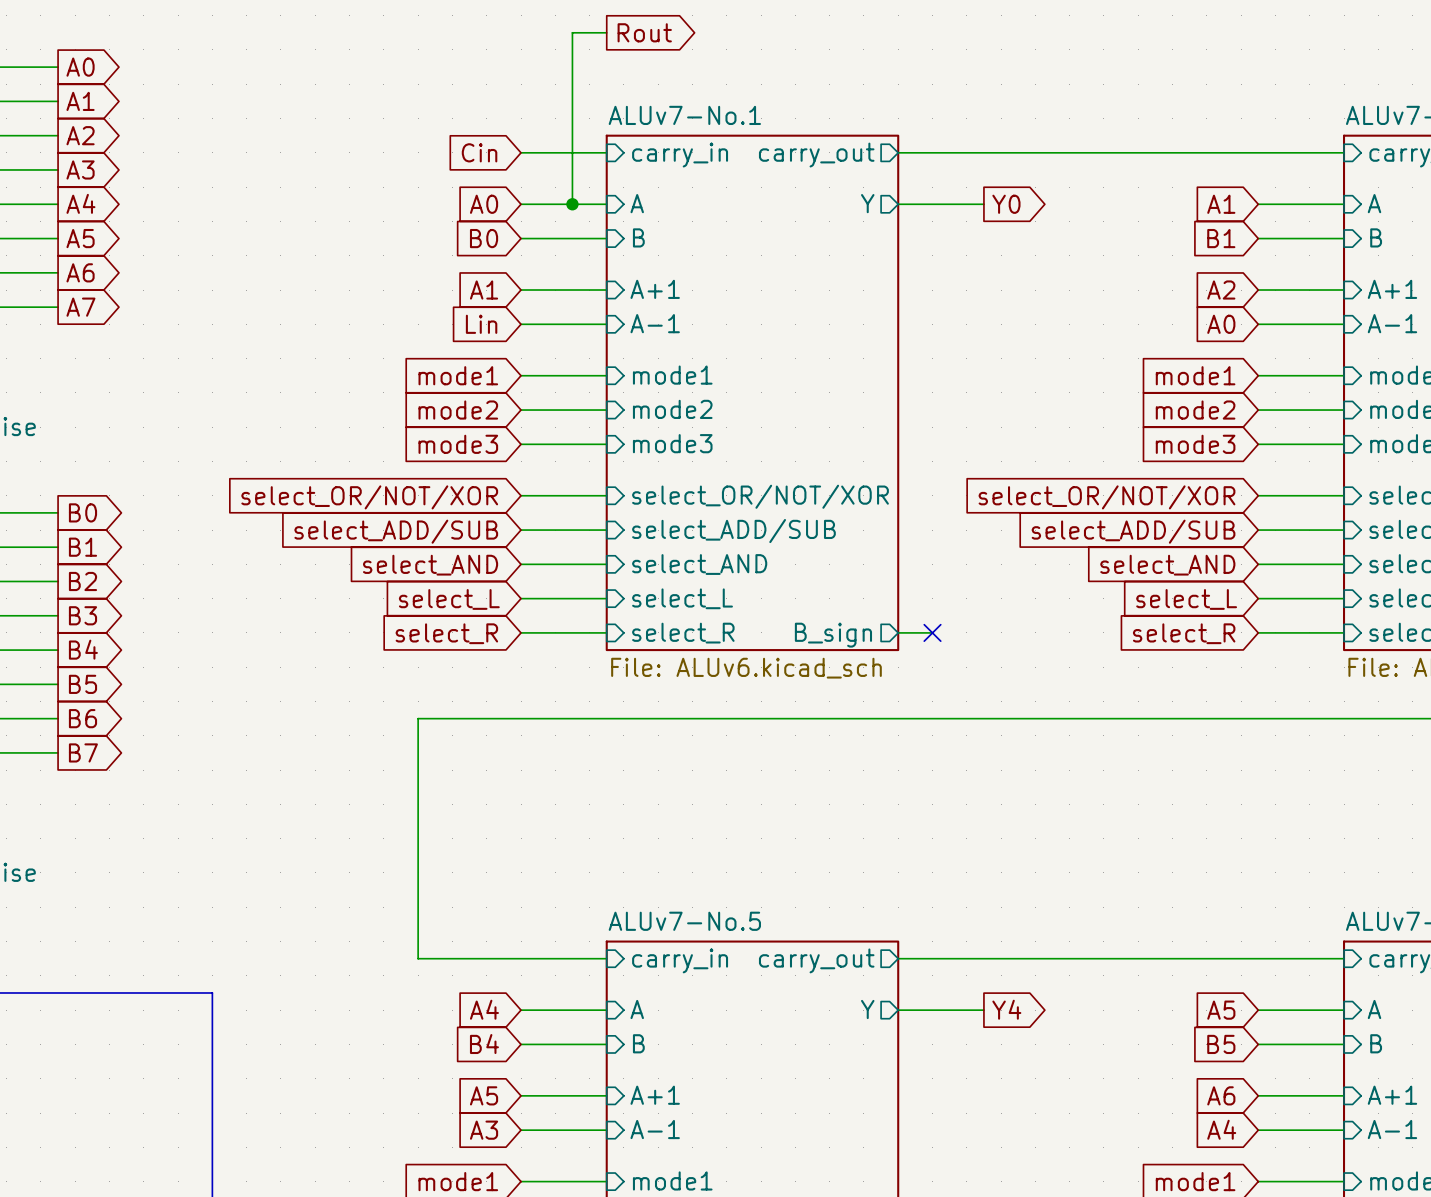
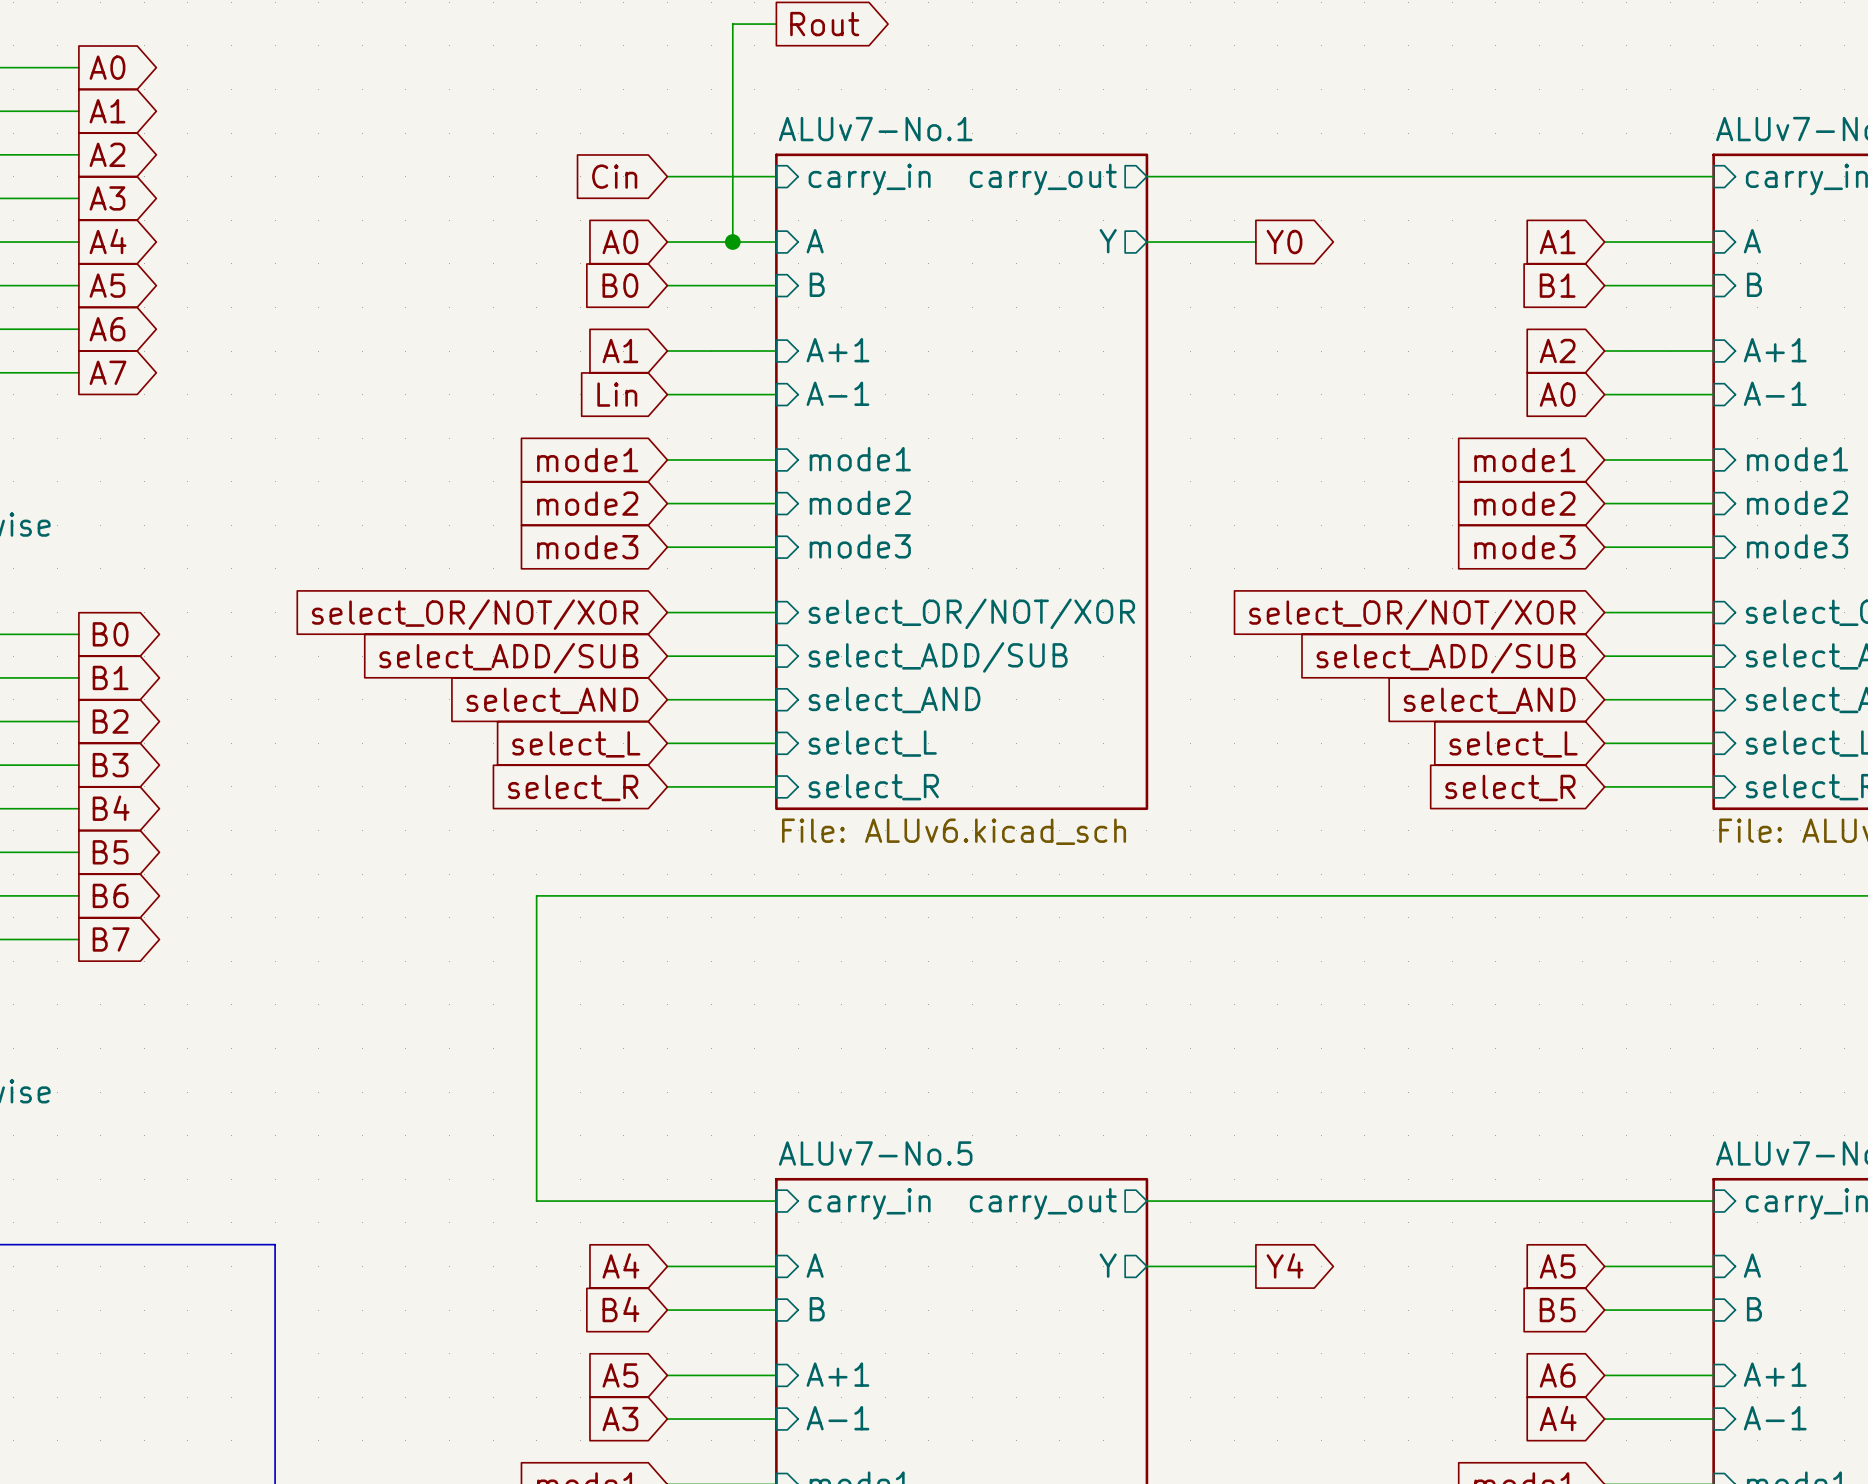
wire: (898, 632) (932, 632) -> none
no-connect mark: (932, 632) -> none
sheet pin: B_sign (833, 635) -> none

